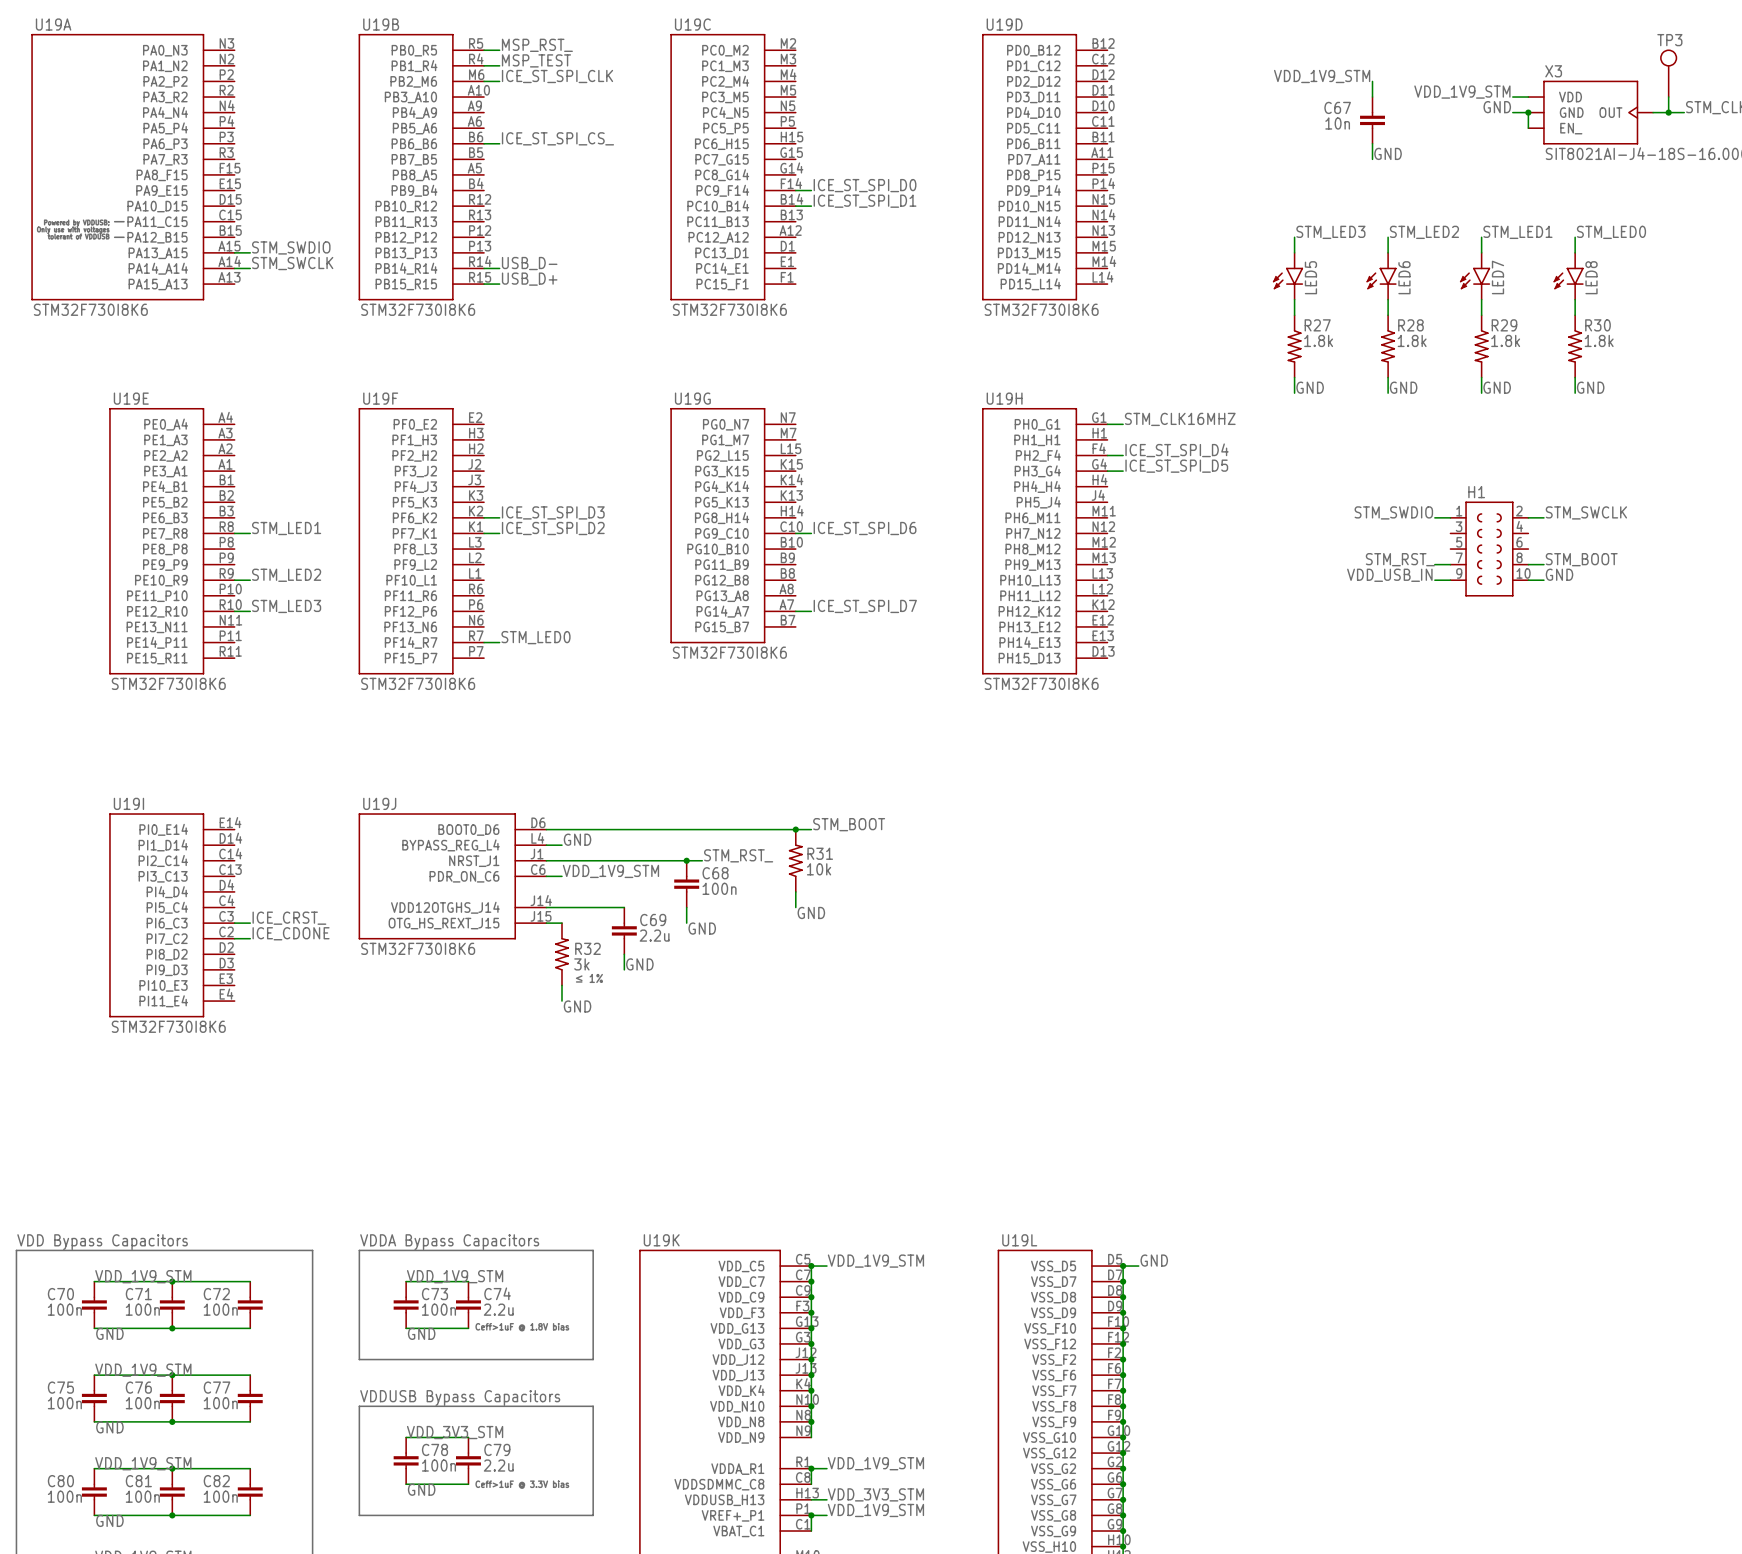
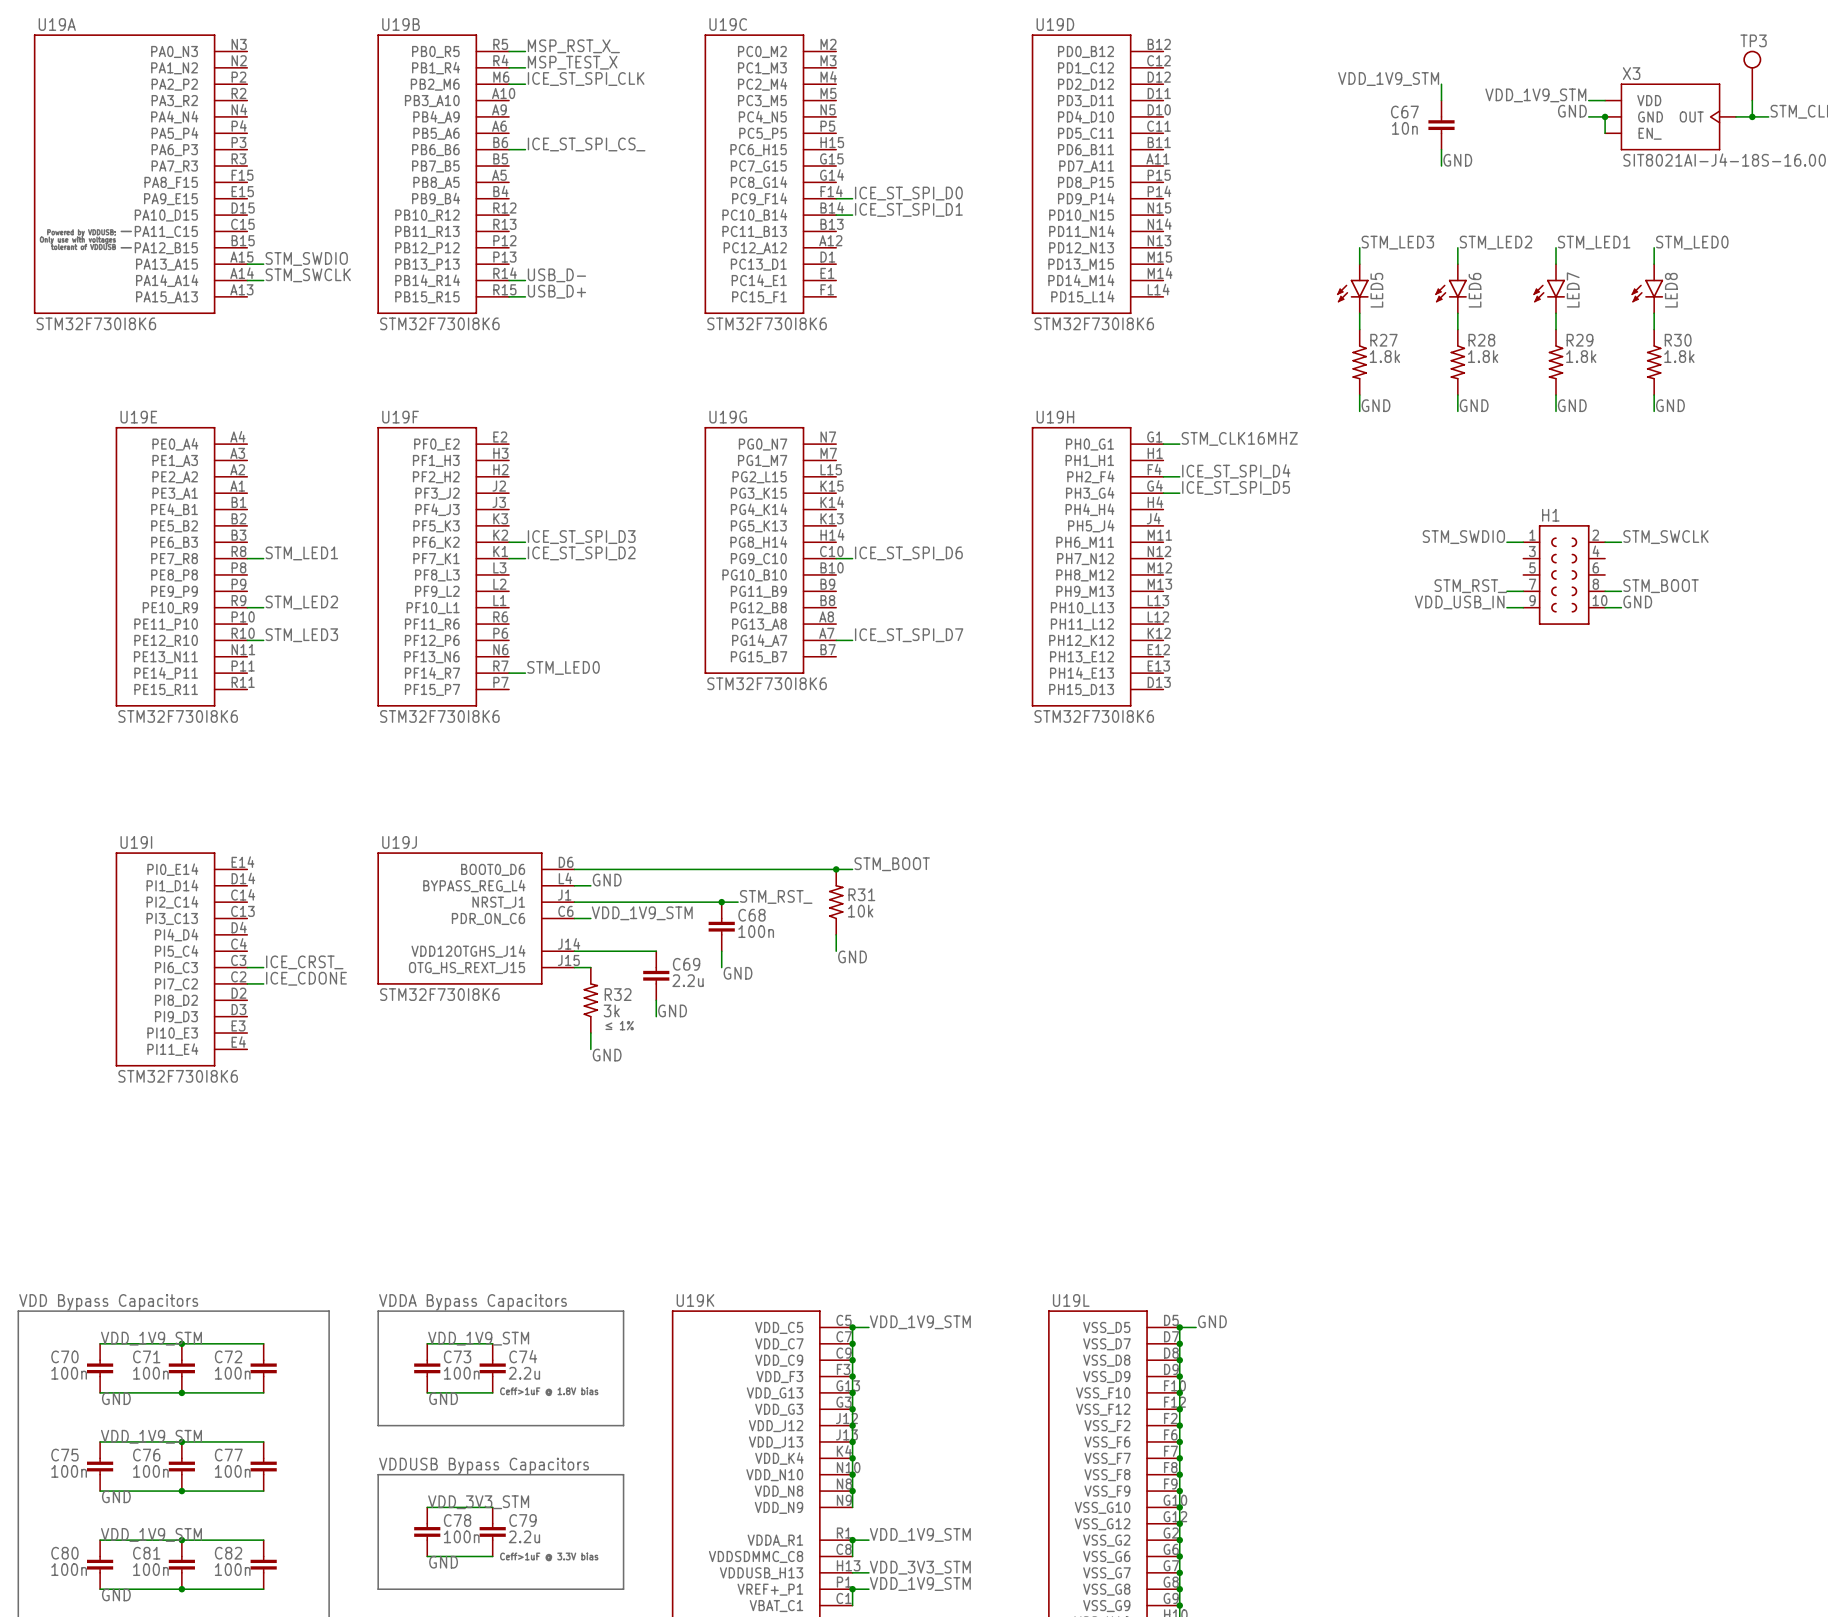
label: MSP_RST_ (537, 45) -> MSP_RST_X_ (573, 46)
label: MSP_TEST (536, 60) -> MSP_TEST_X (572, 62)

